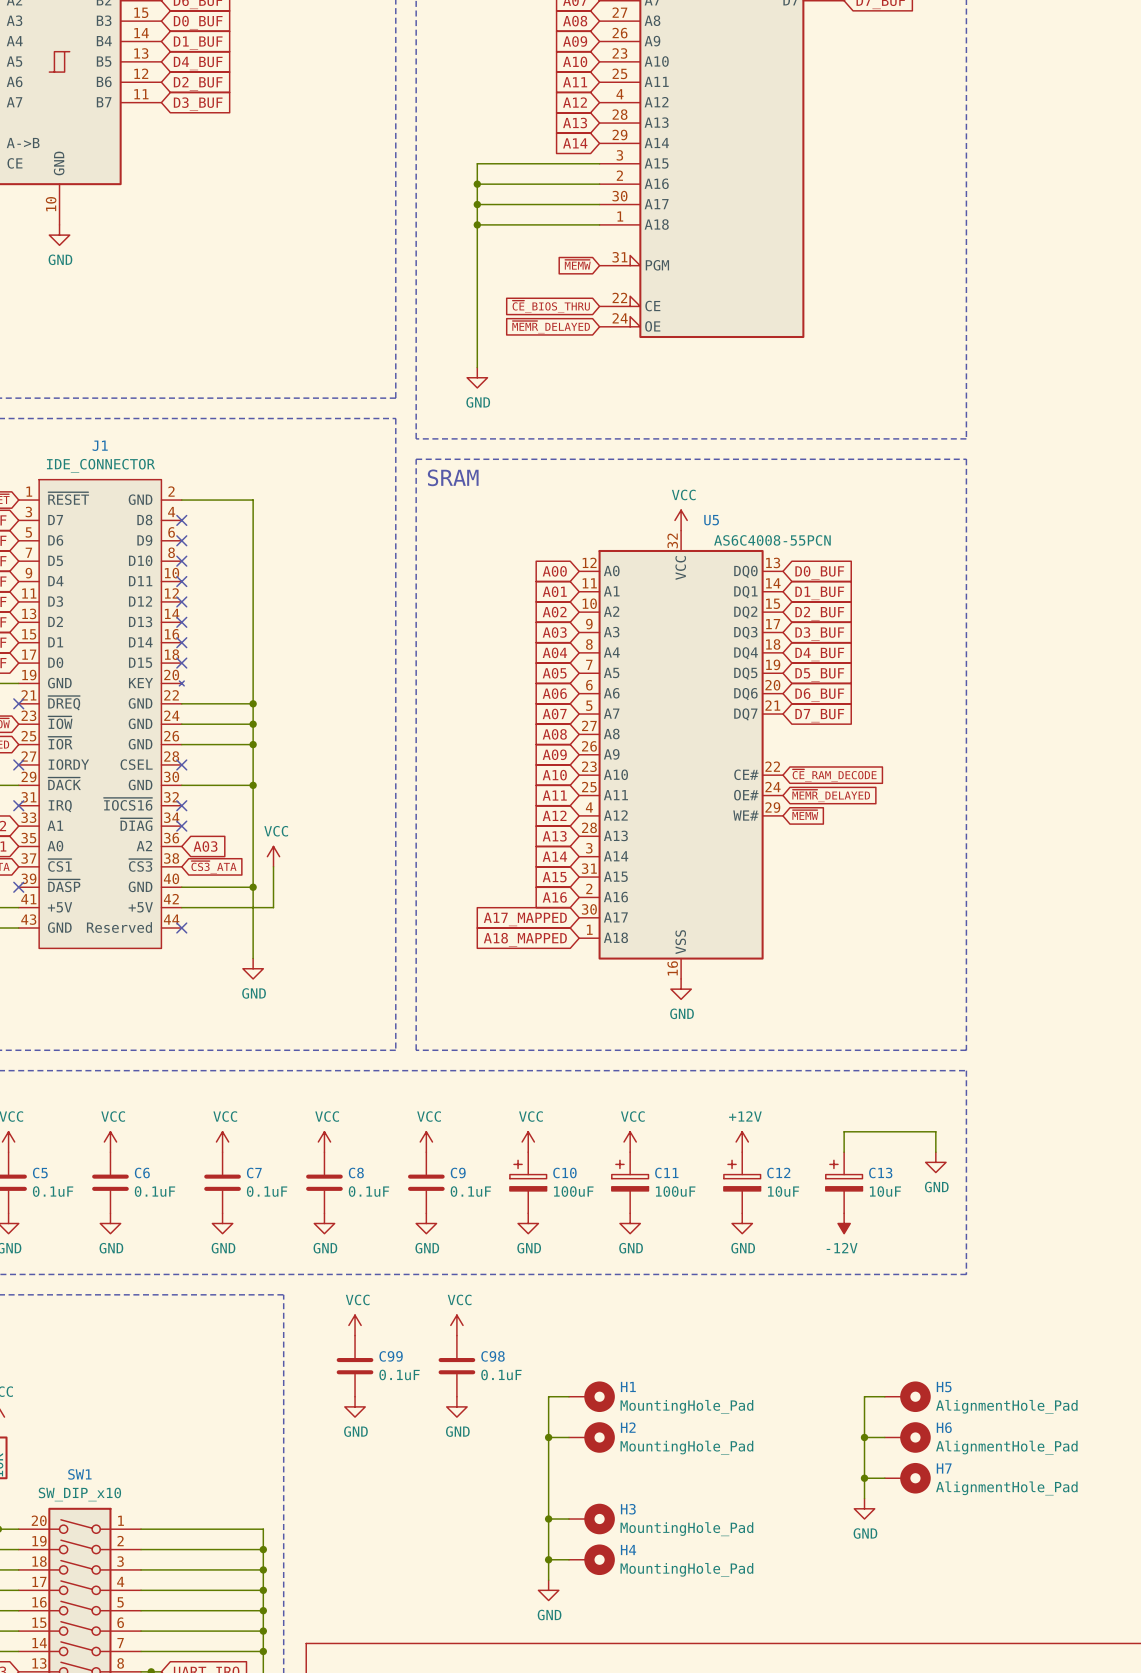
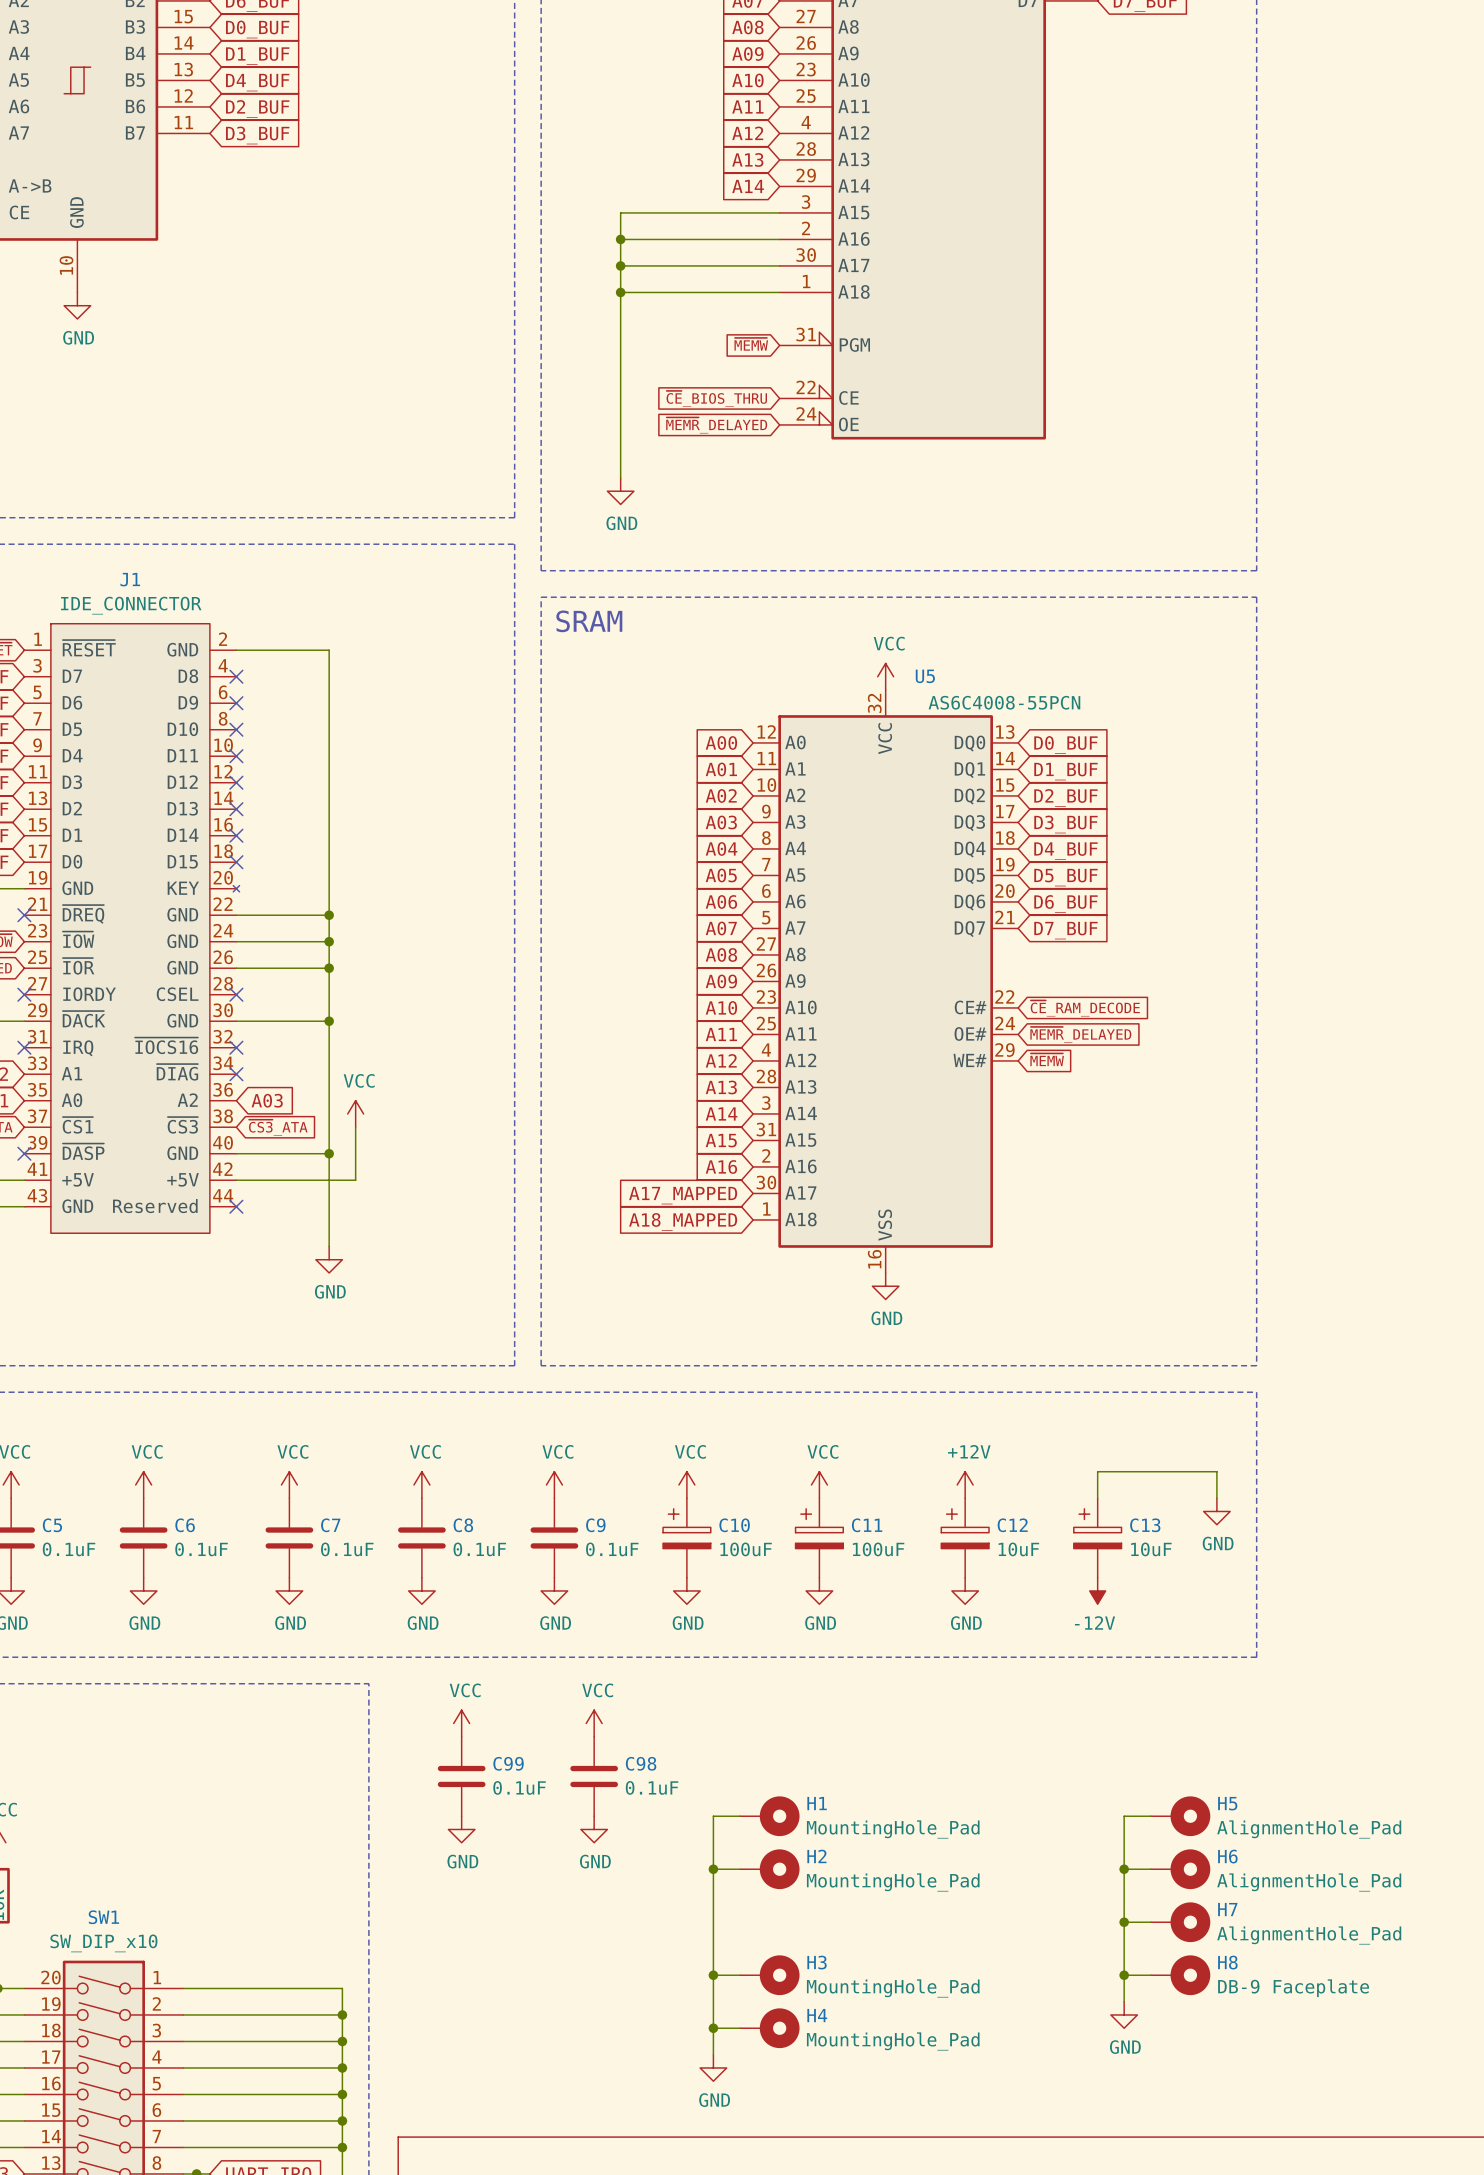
wire: none -> (1124, 1948) (1124, 2001)
power symbol position: GND (864, 1508) -> GND (1124, 2014)
wire: none -> (1124, 1975) (1150, 1975)
junction: none -> (1124, 1975)
H8: none -> DB-9 Faceplate (1180, 1975)

